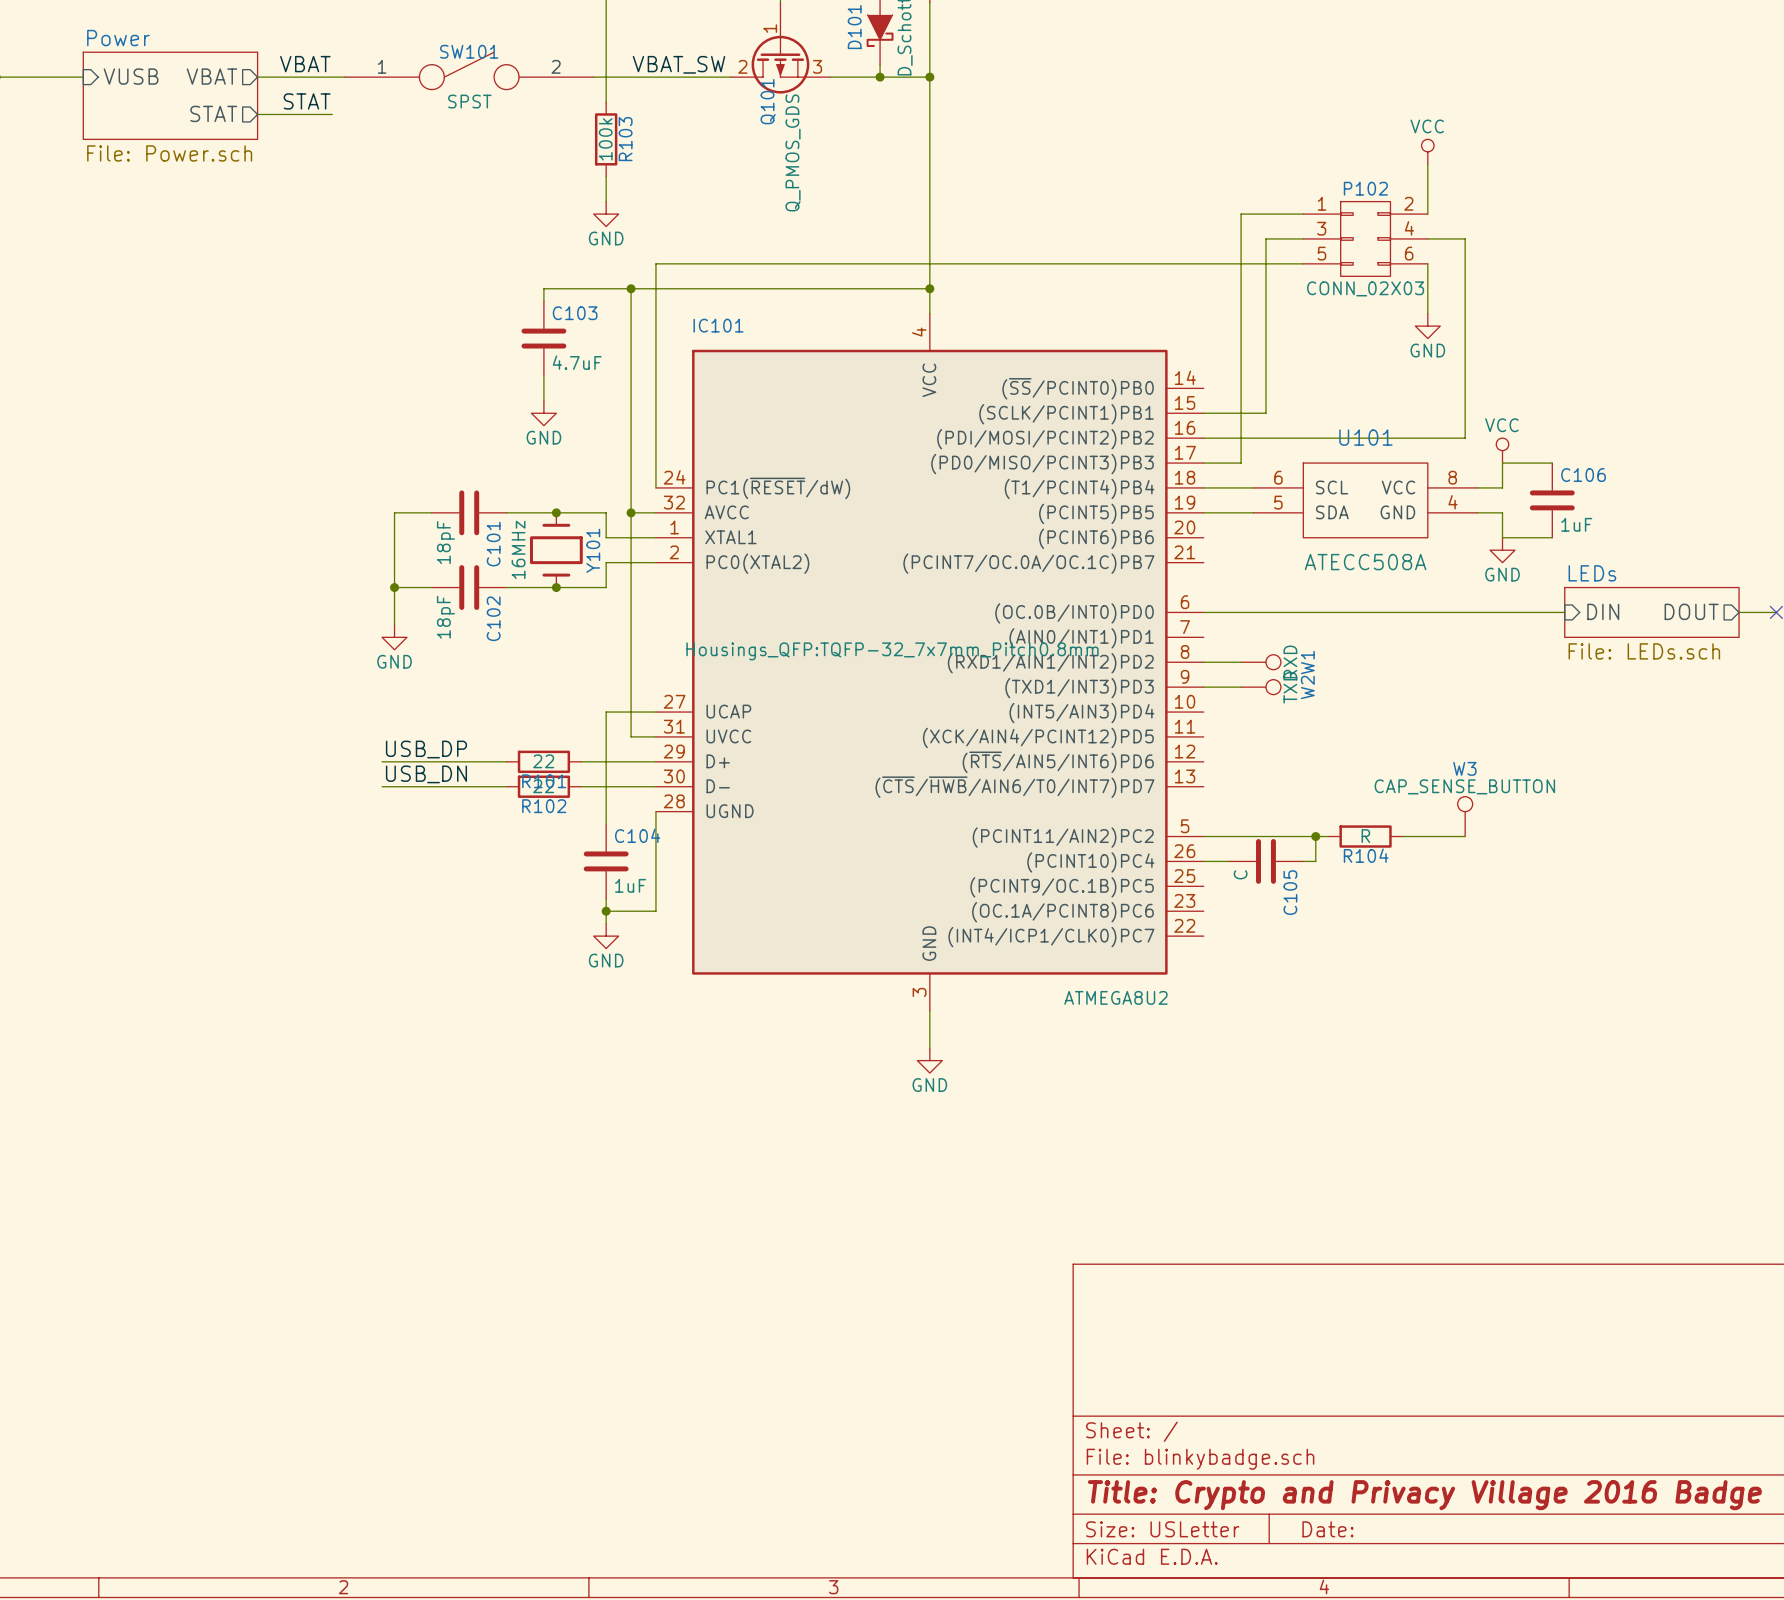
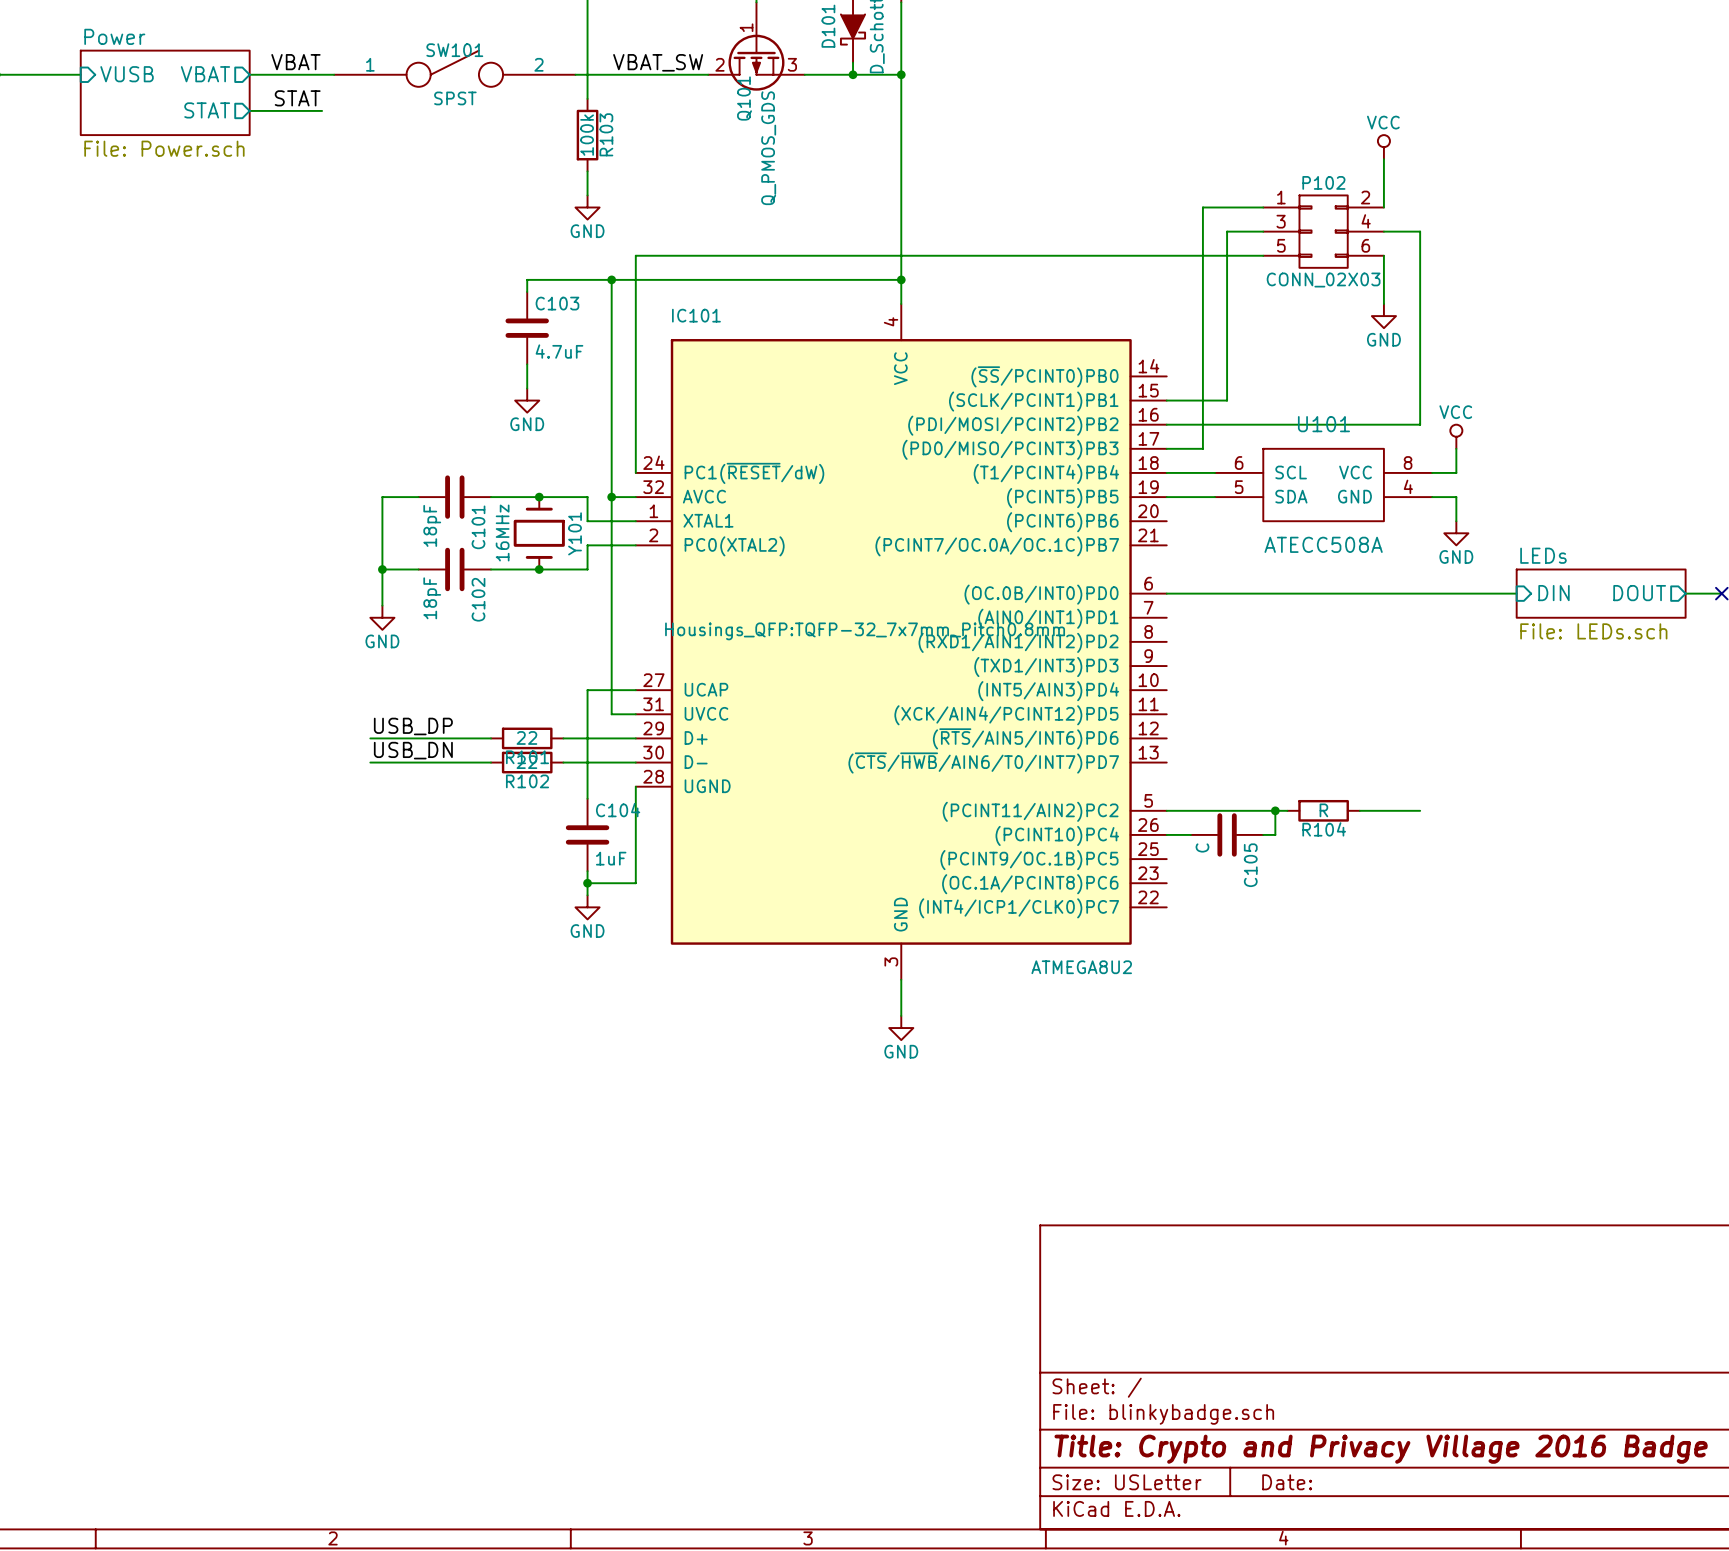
wire: (1502, 463) (1552, 463) -> none
C106: 1uF (1552, 500) -> none
wire: (1502, 537) (1552, 537) -> none
wire: (1203, 662) (1241, 662) -> none
W1: RXD (1260, 662) -> none
wire: (1203, 687) (1241, 687) -> none
W2: TXD (1260, 687) -> none
W3: CAP_SENSE_BUTTON (1465, 816) -> none

